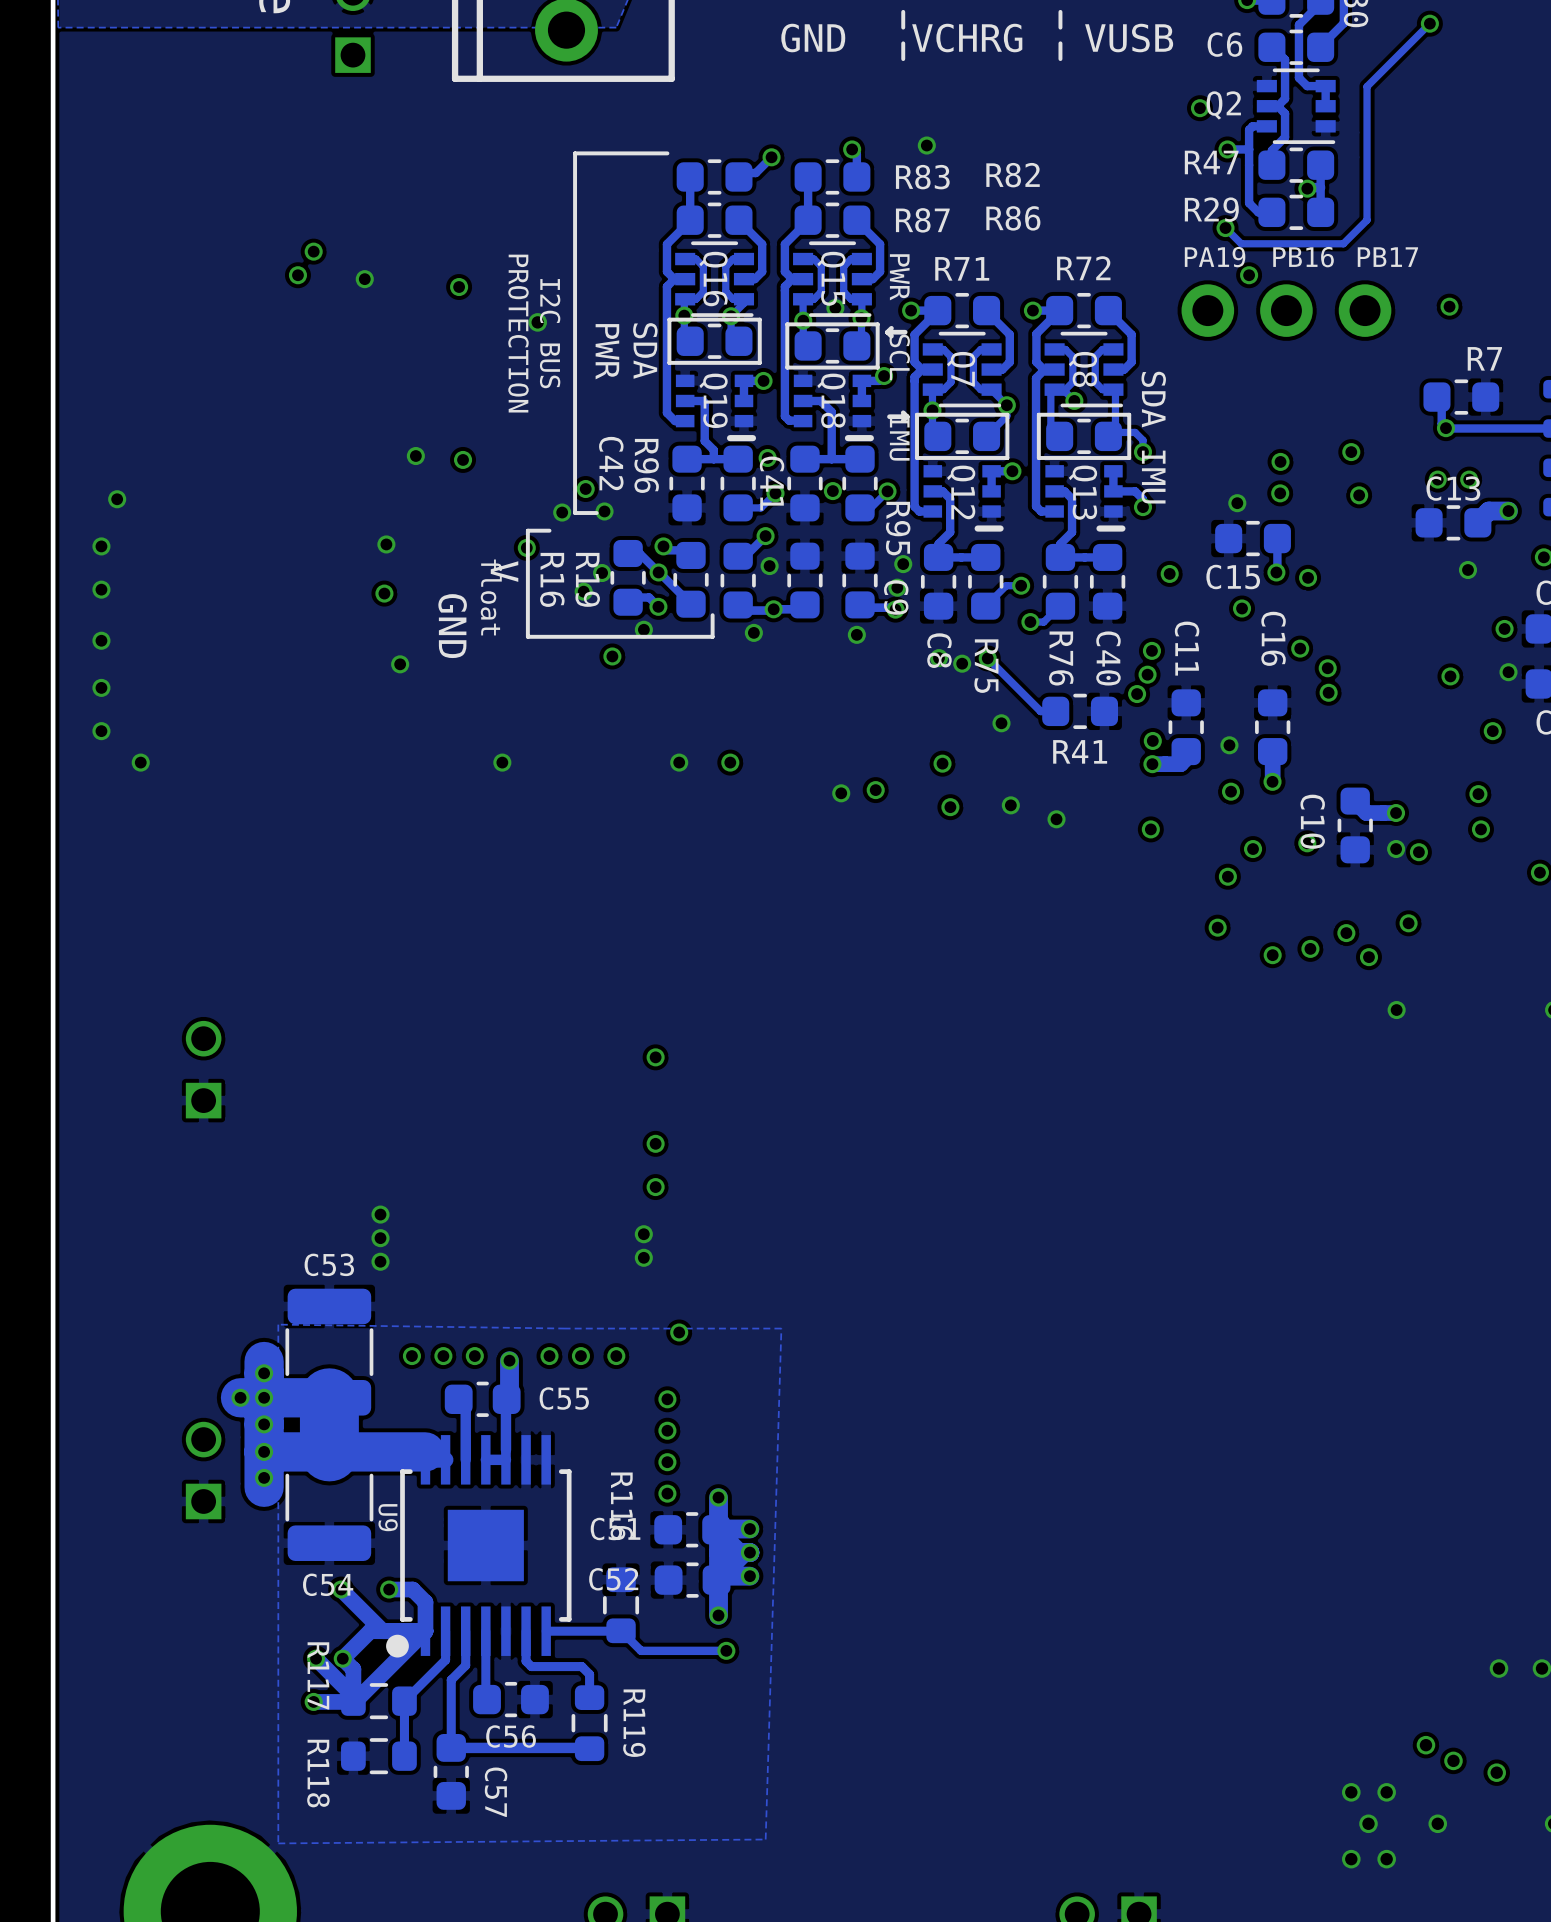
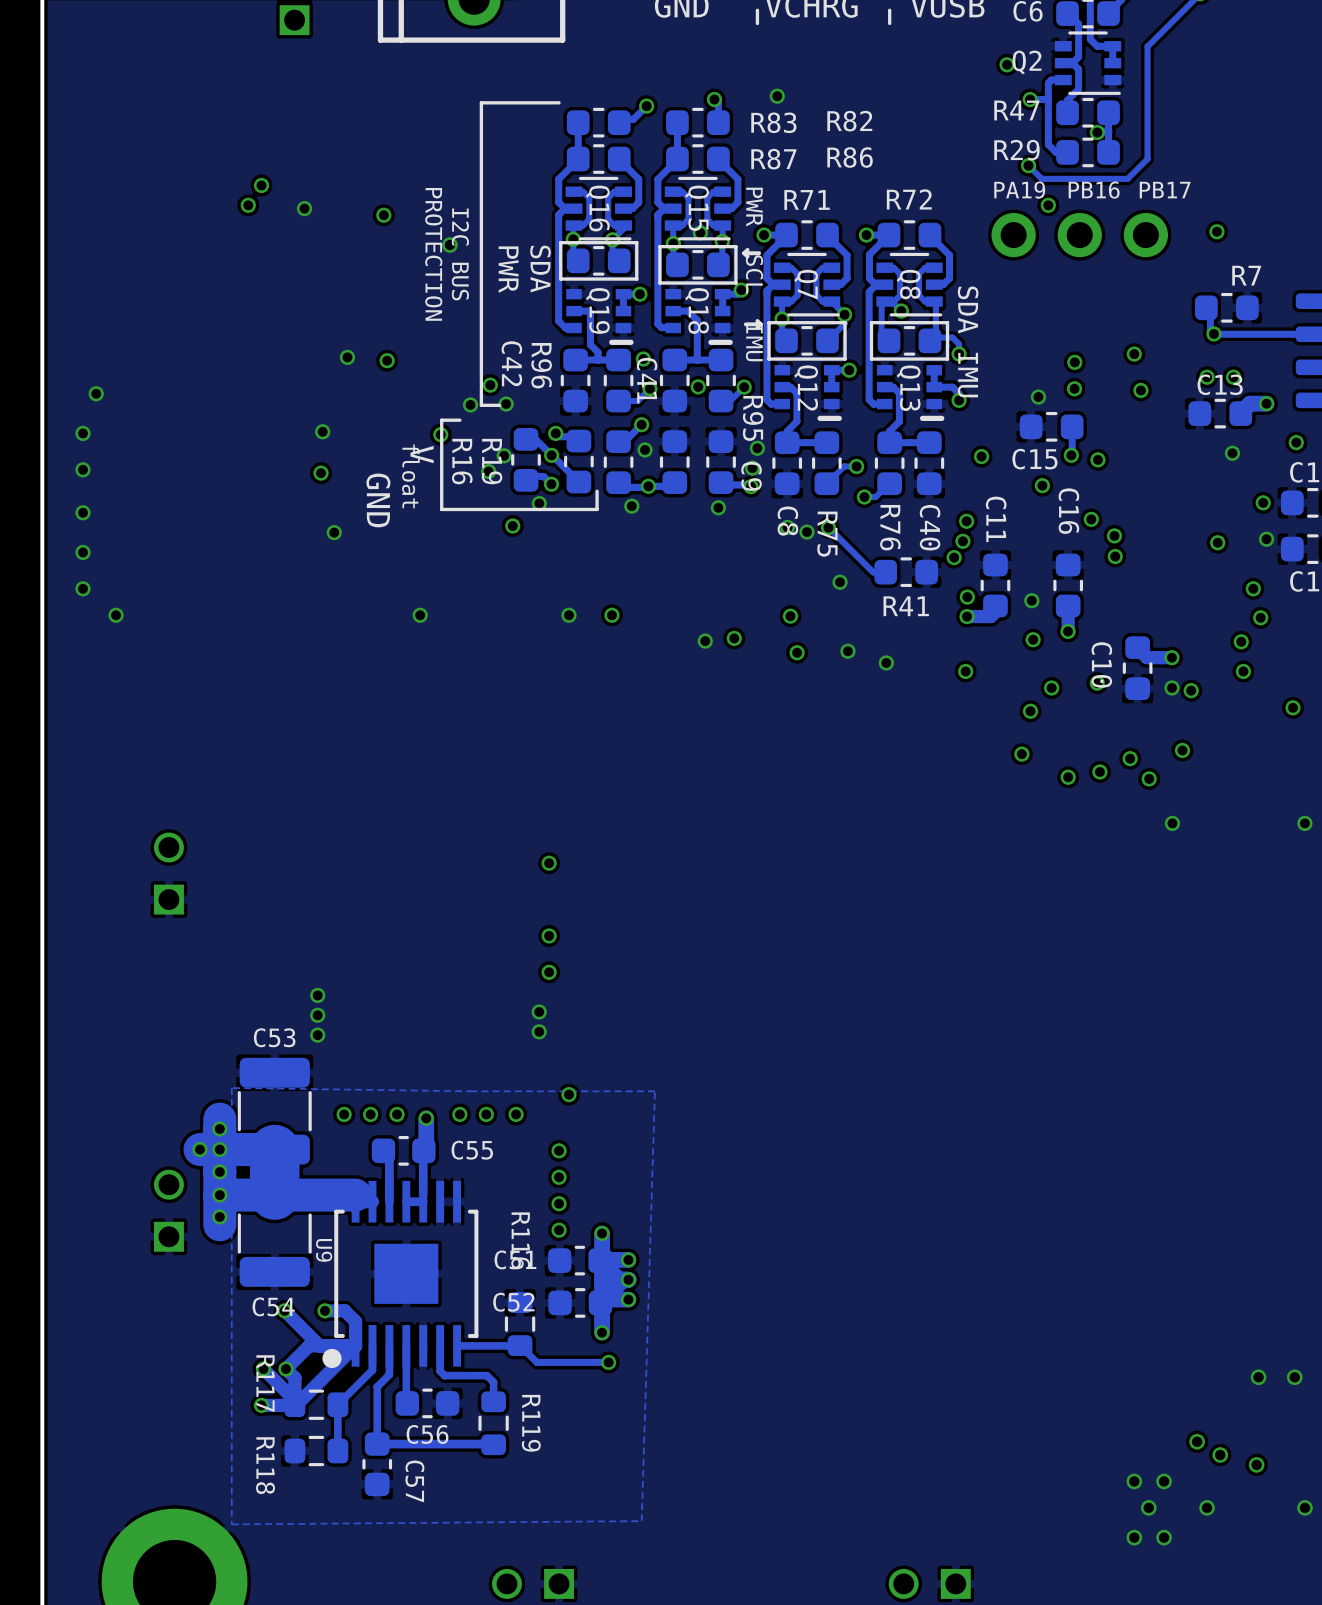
via: none -> (1260, 617)

